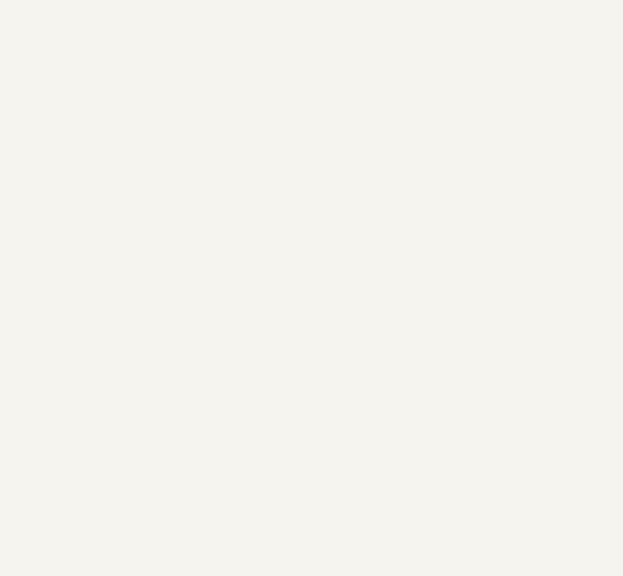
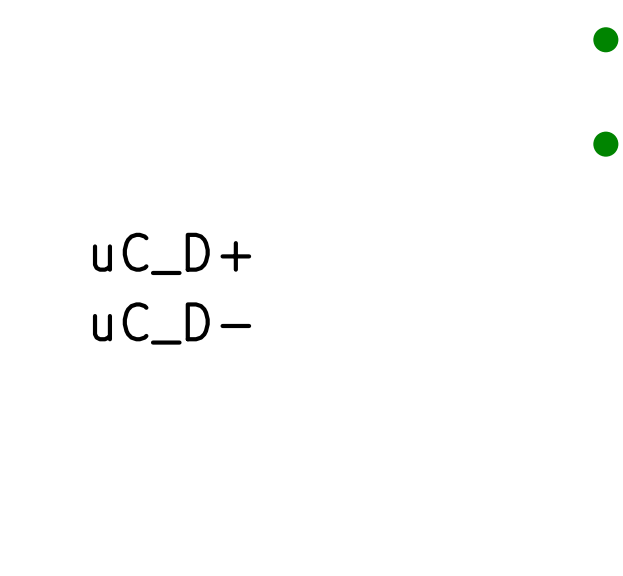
junction: none -> (605, 39)
junction: none -> (605, 144)
label: none -> uC_D+ (172, 253)
label: none -> uC_D- (172, 323)

